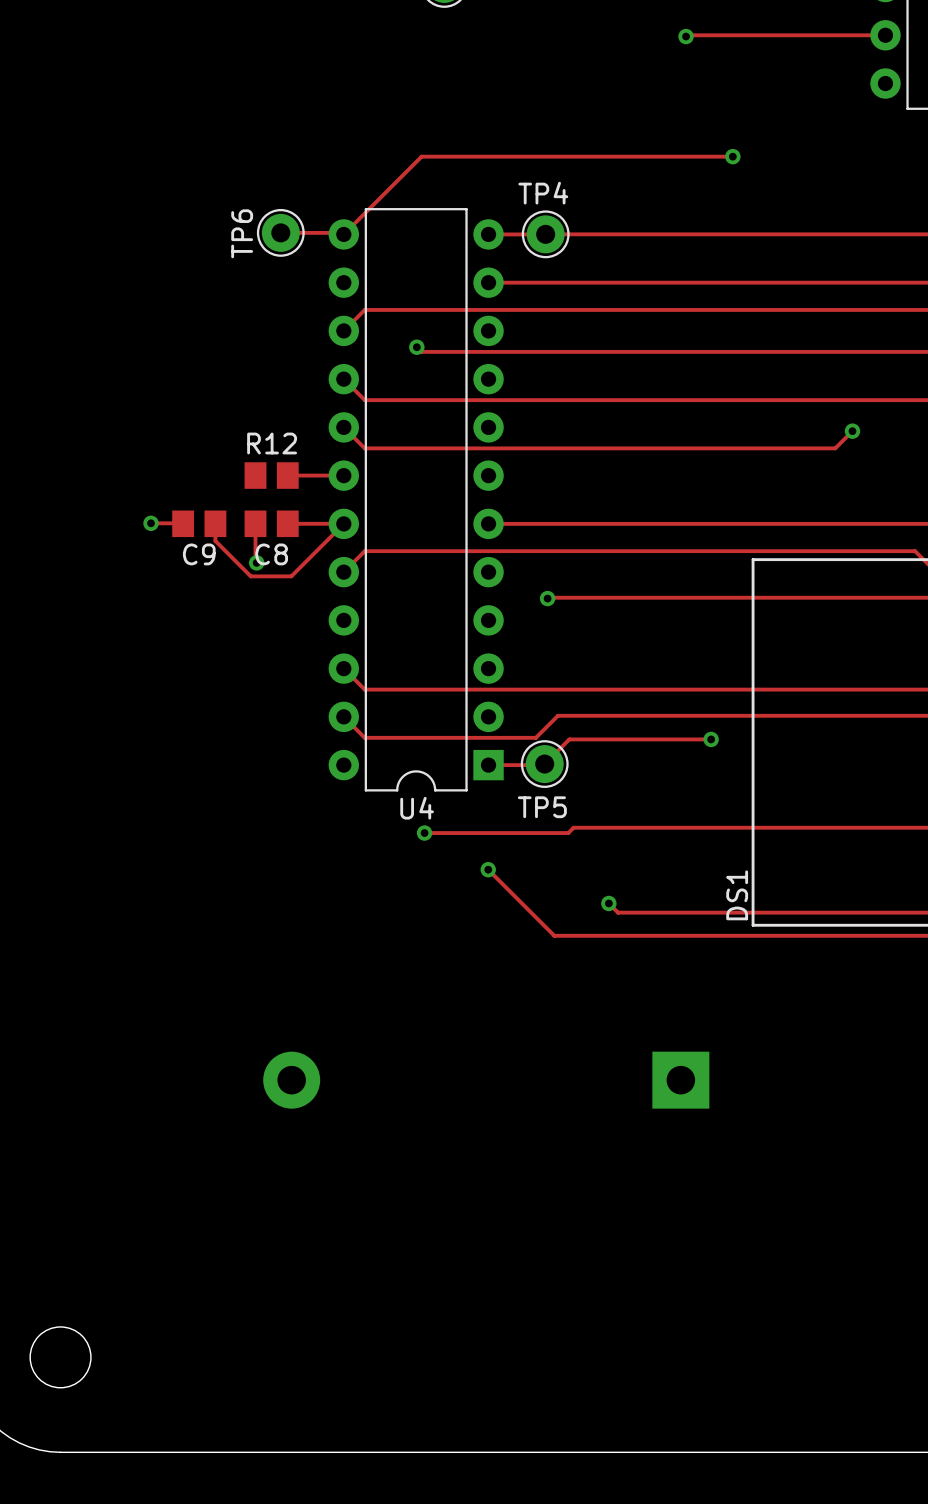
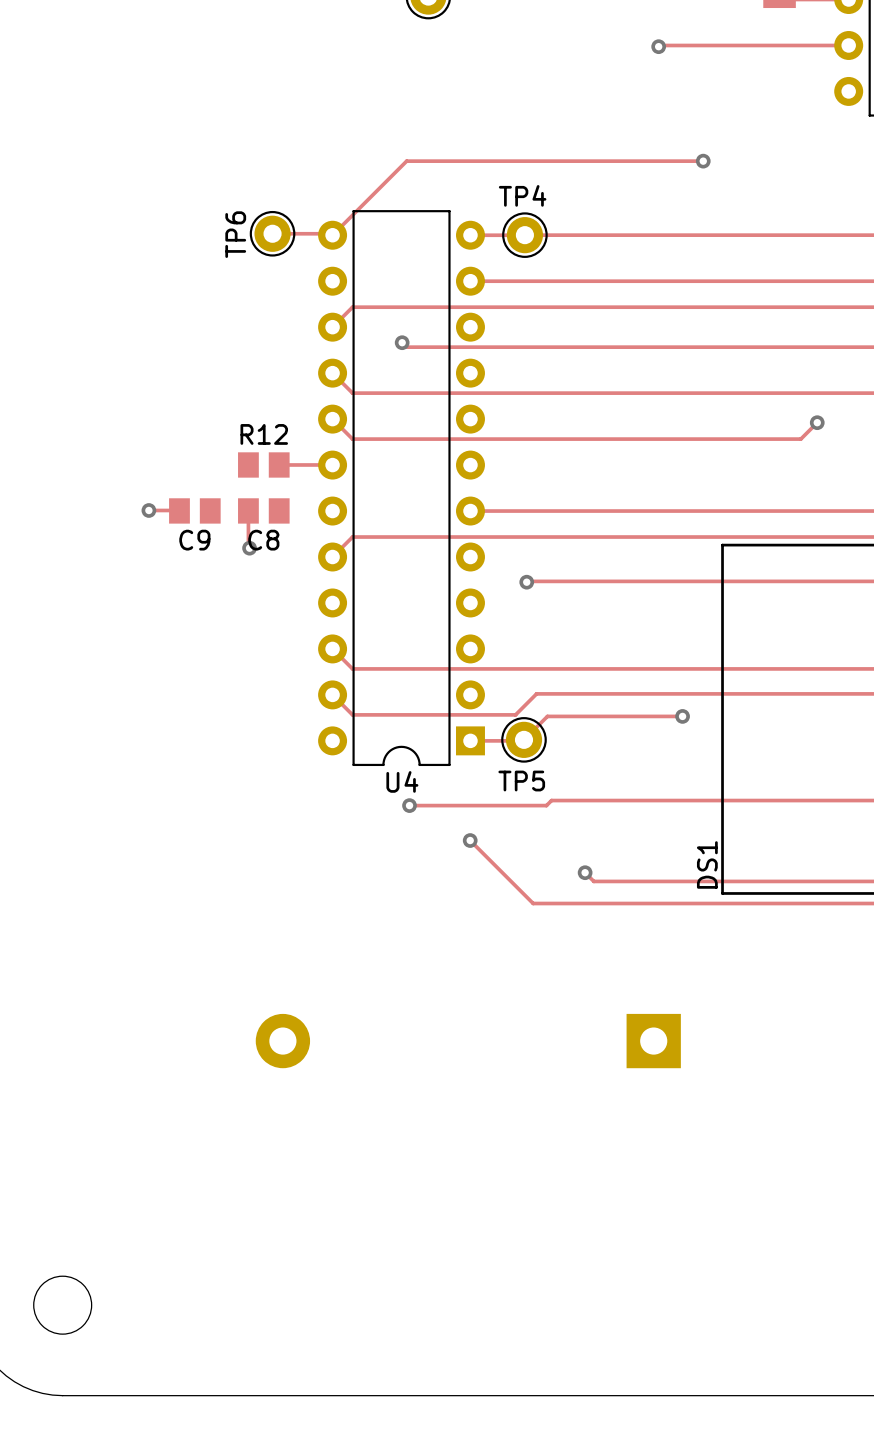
track: (215, 523) (215, 540) (250, 576) (291, 576) (343, 523) -> none
track: (287, 523) (343, 523) -> none

